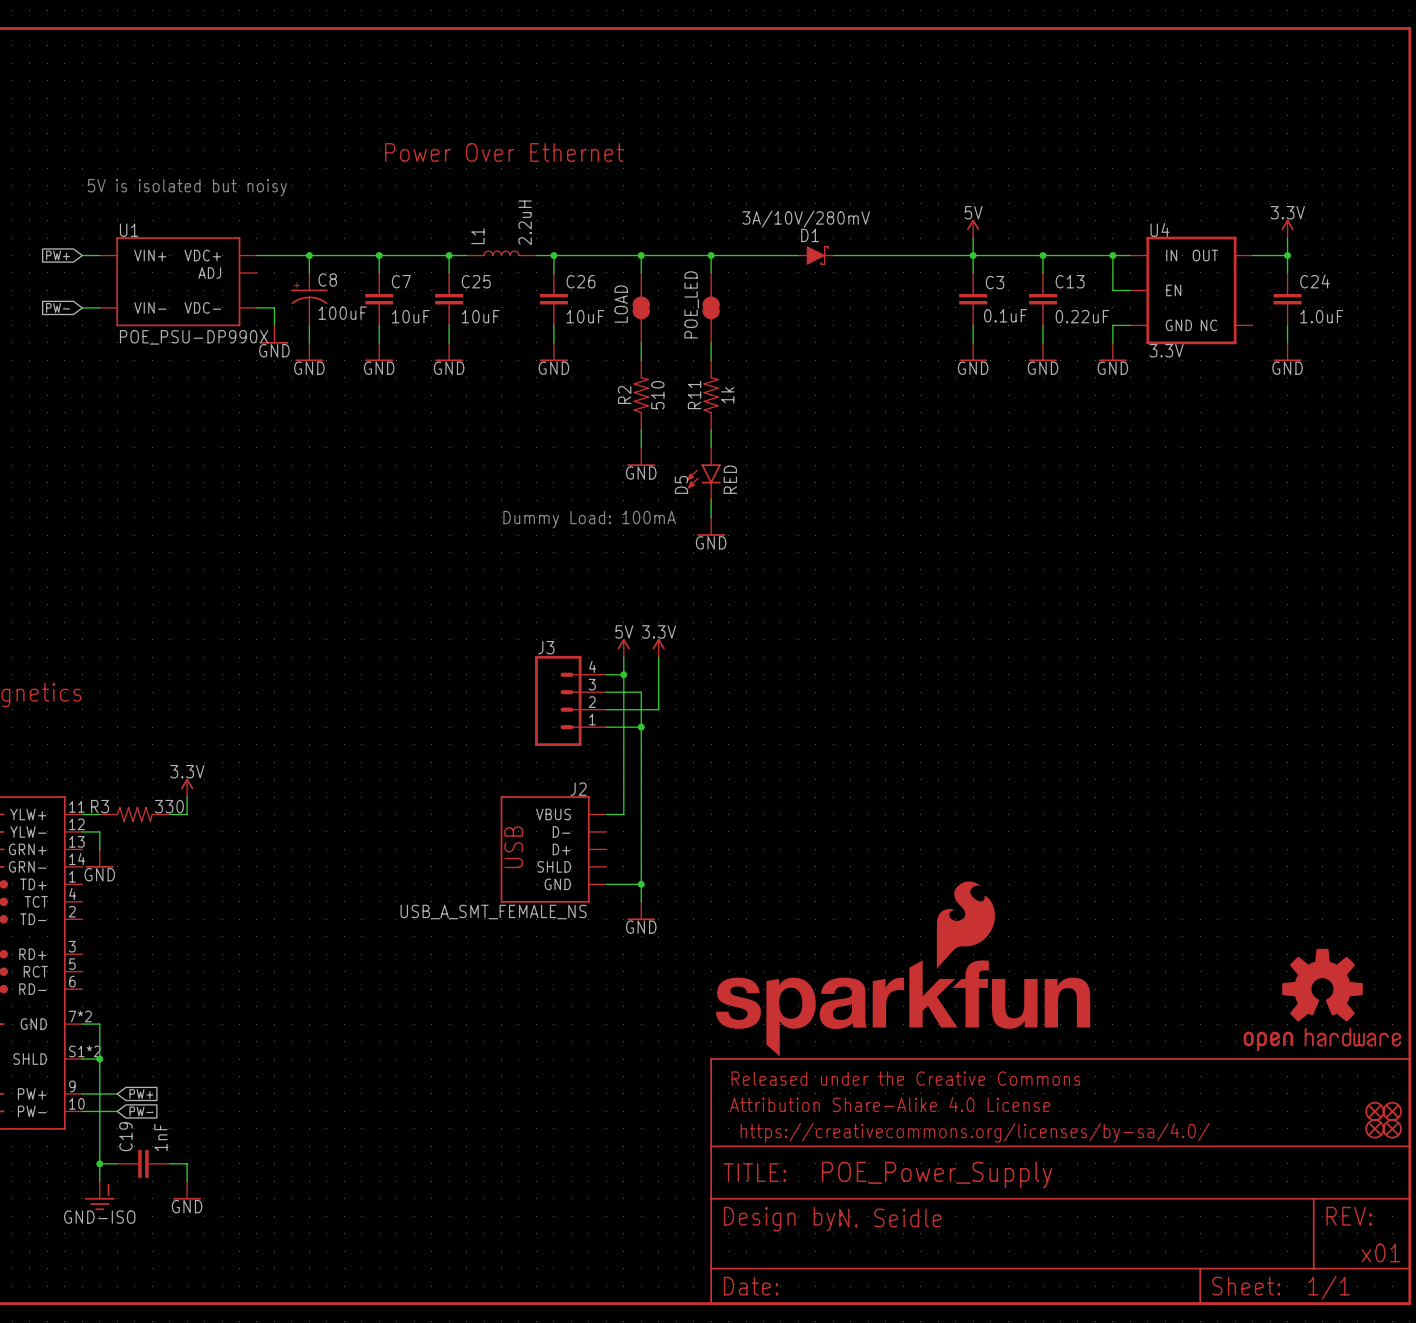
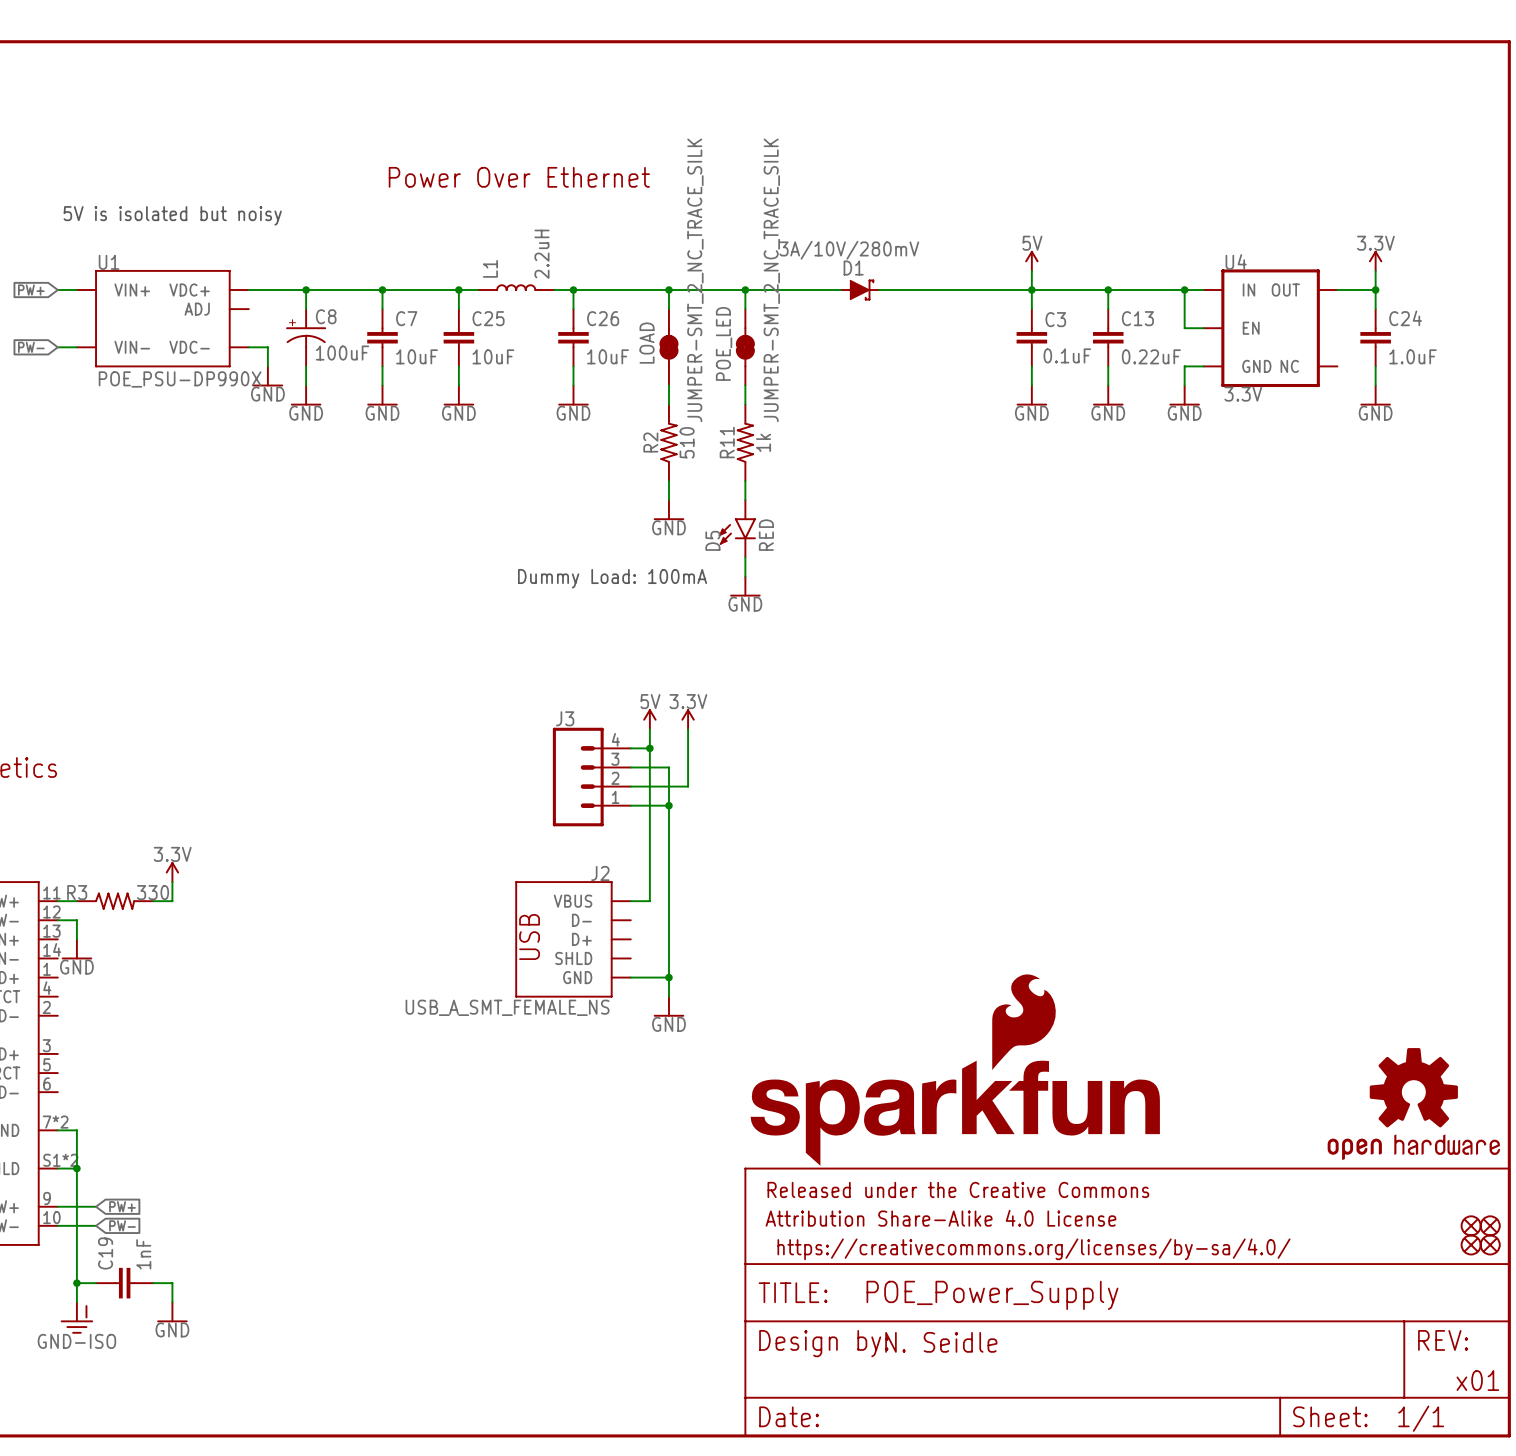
LOAD value: none -> JUMPER-SMT_2_NC_TRACE_SILK (695, 280)
POE_LED value: none -> JUMPER-SMT_2_NC_TRACE_SILK (771, 280)

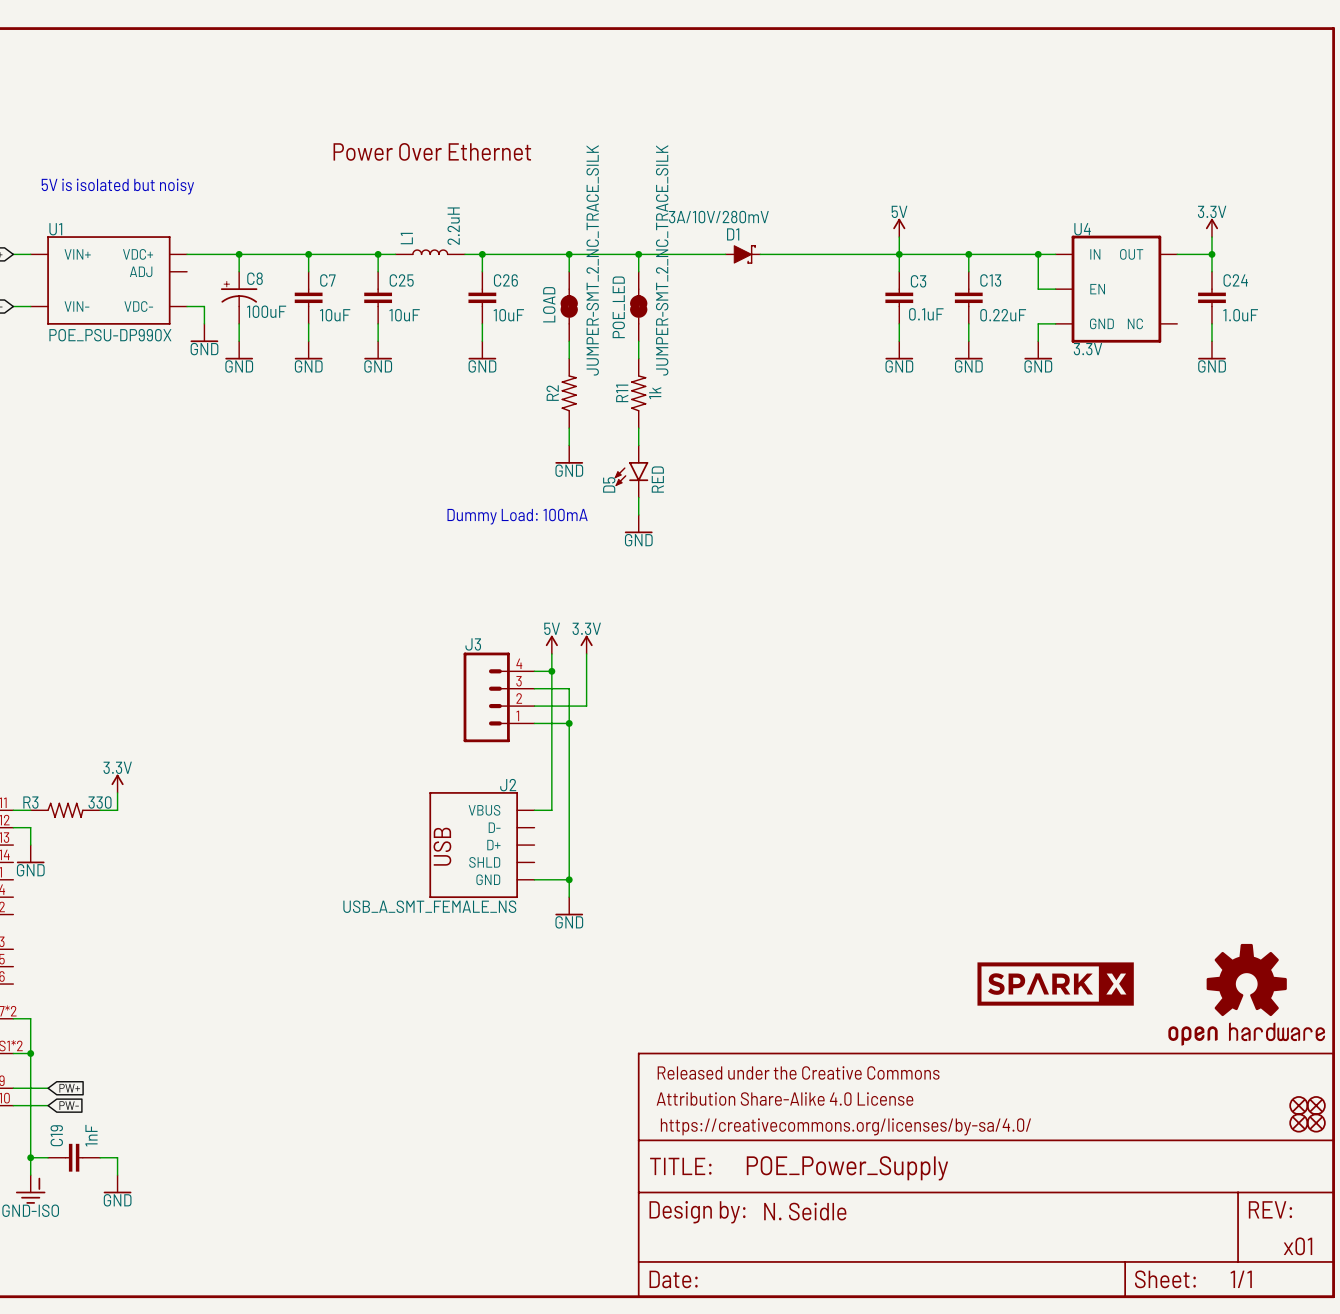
R2 value: 510 (687, 442) -> none
part: (955, 1070) -> none
part: none -> (1055, 984)

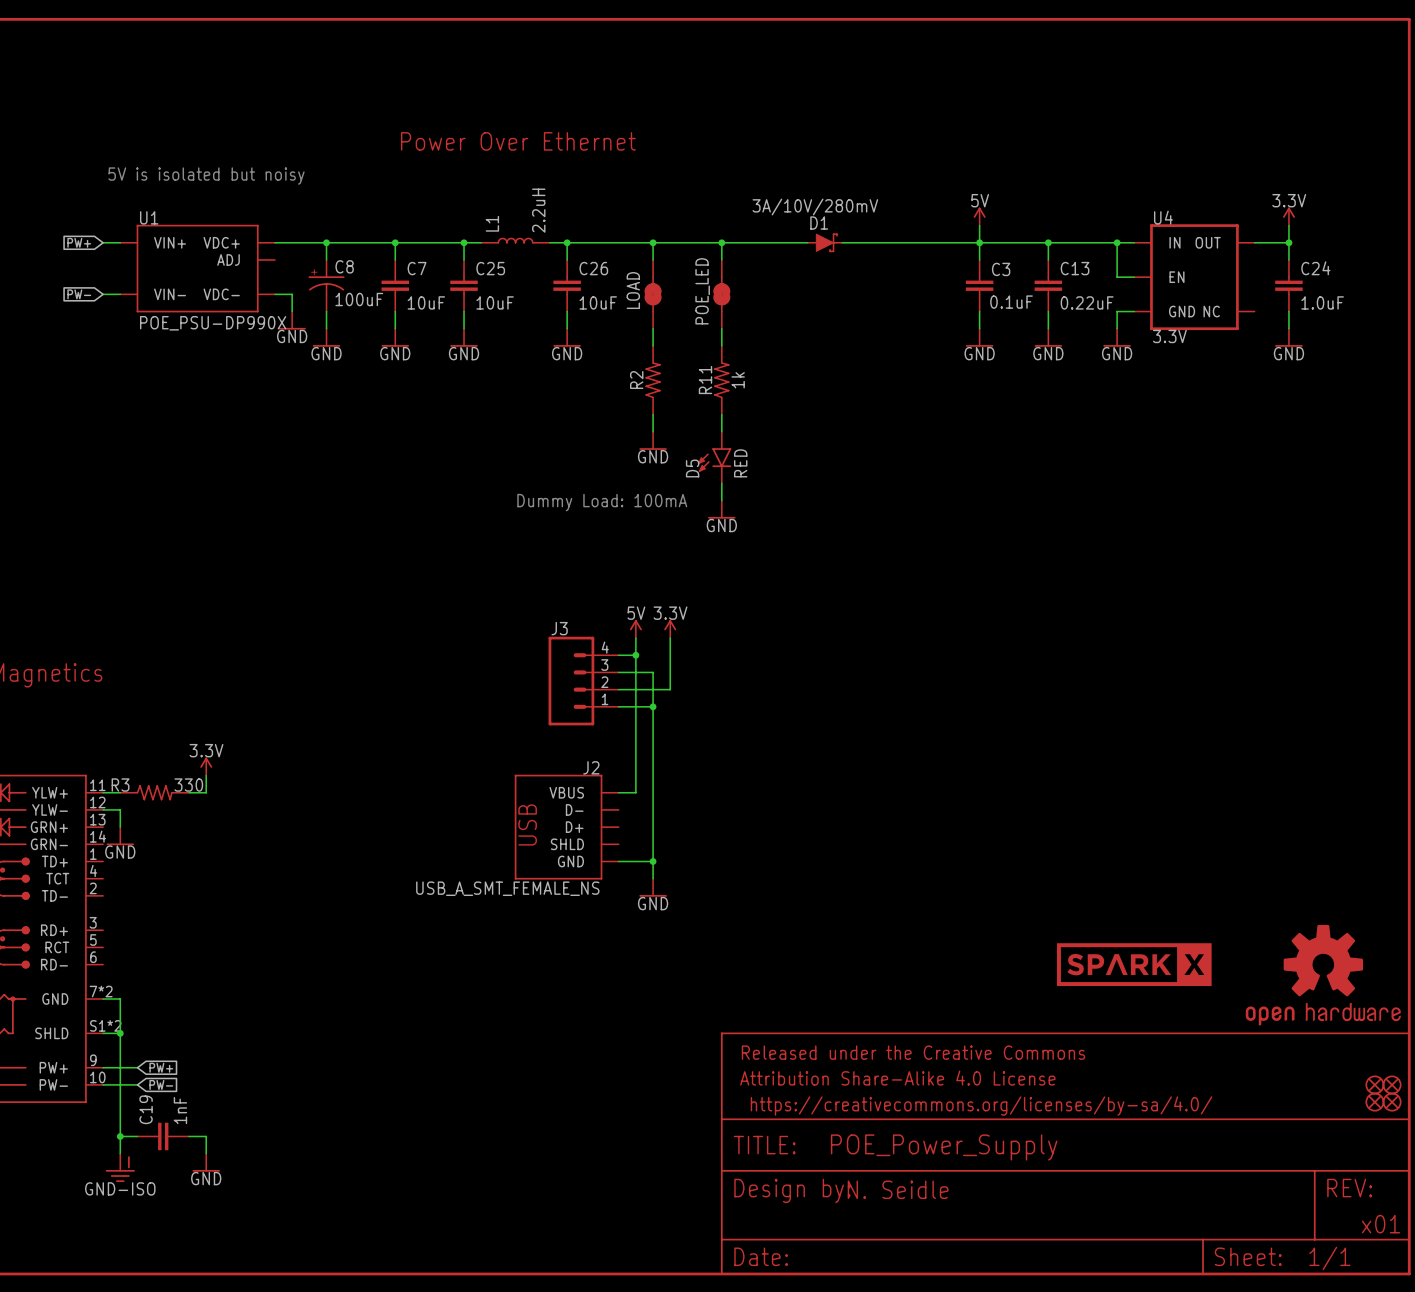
LOAD value: JUMPER-SMT_2_NC_TRACE_SILK (592, 260) -> none
POE_LED value: JUMPER-SMT_2_NC_TRACE_SILK (662, 260) -> none

